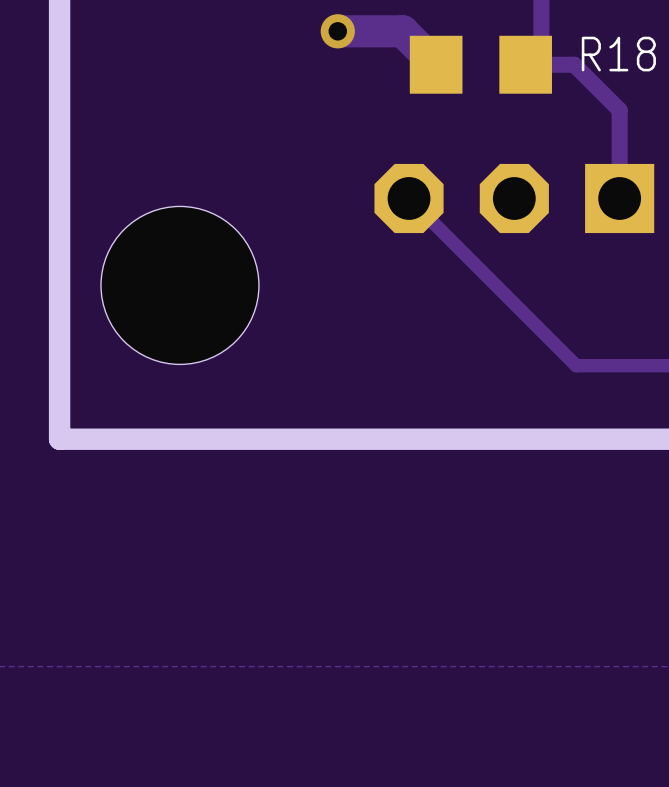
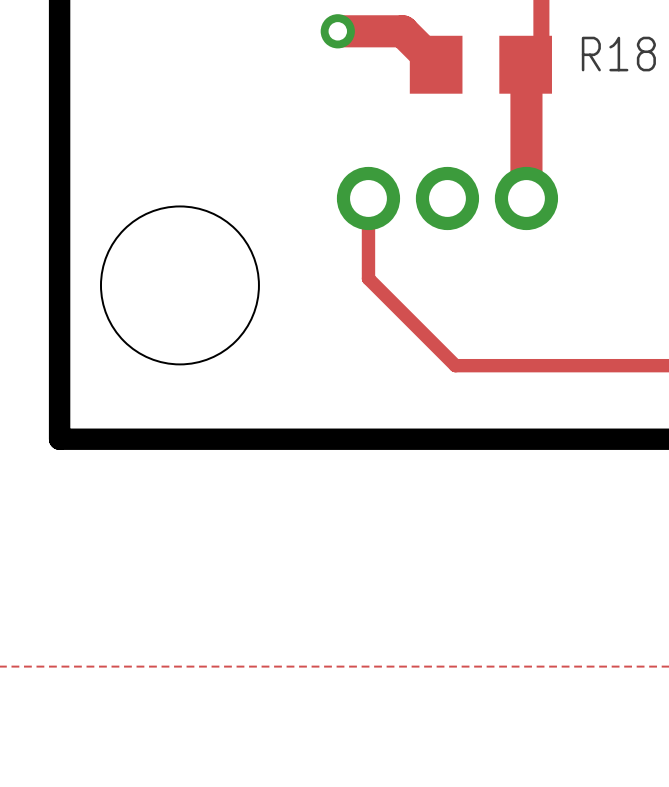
track: (541, 64) (574, 64) (619, 110) (619, 198) -> none
track: none -> (526, 65) (526, 198)
track: (409, 198) (576, 365) -> (368, 198) (368, 278) (455, 365) (576, 365)
part: none -> (447, 198)
part: (514, 198) -> none

